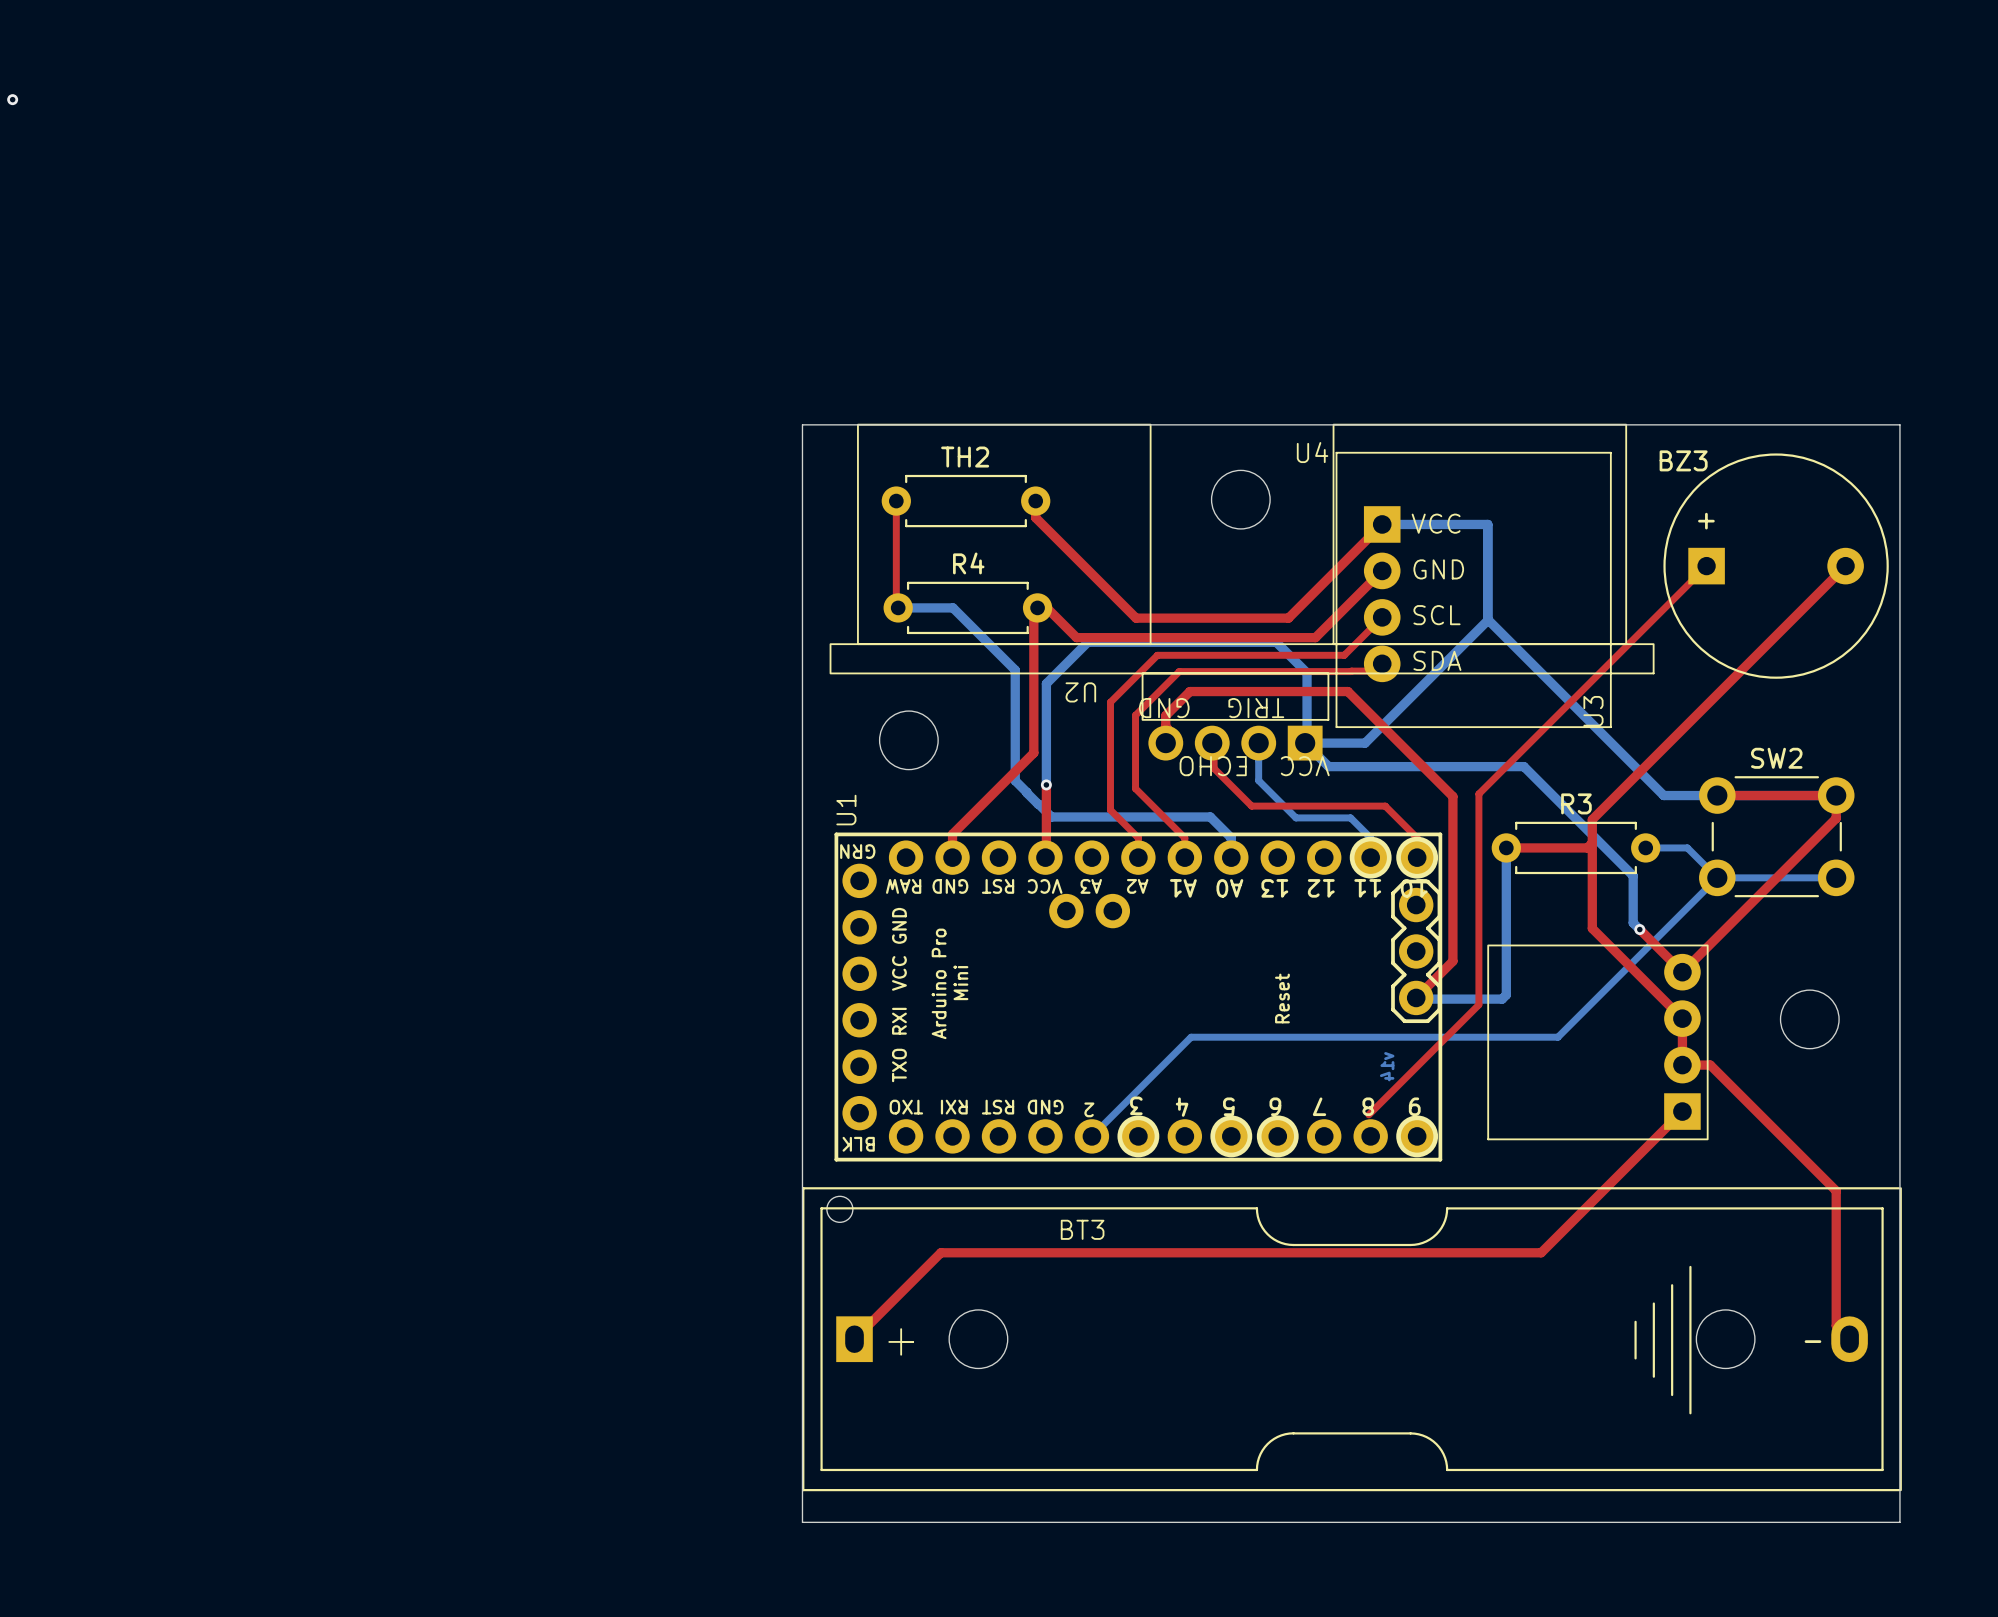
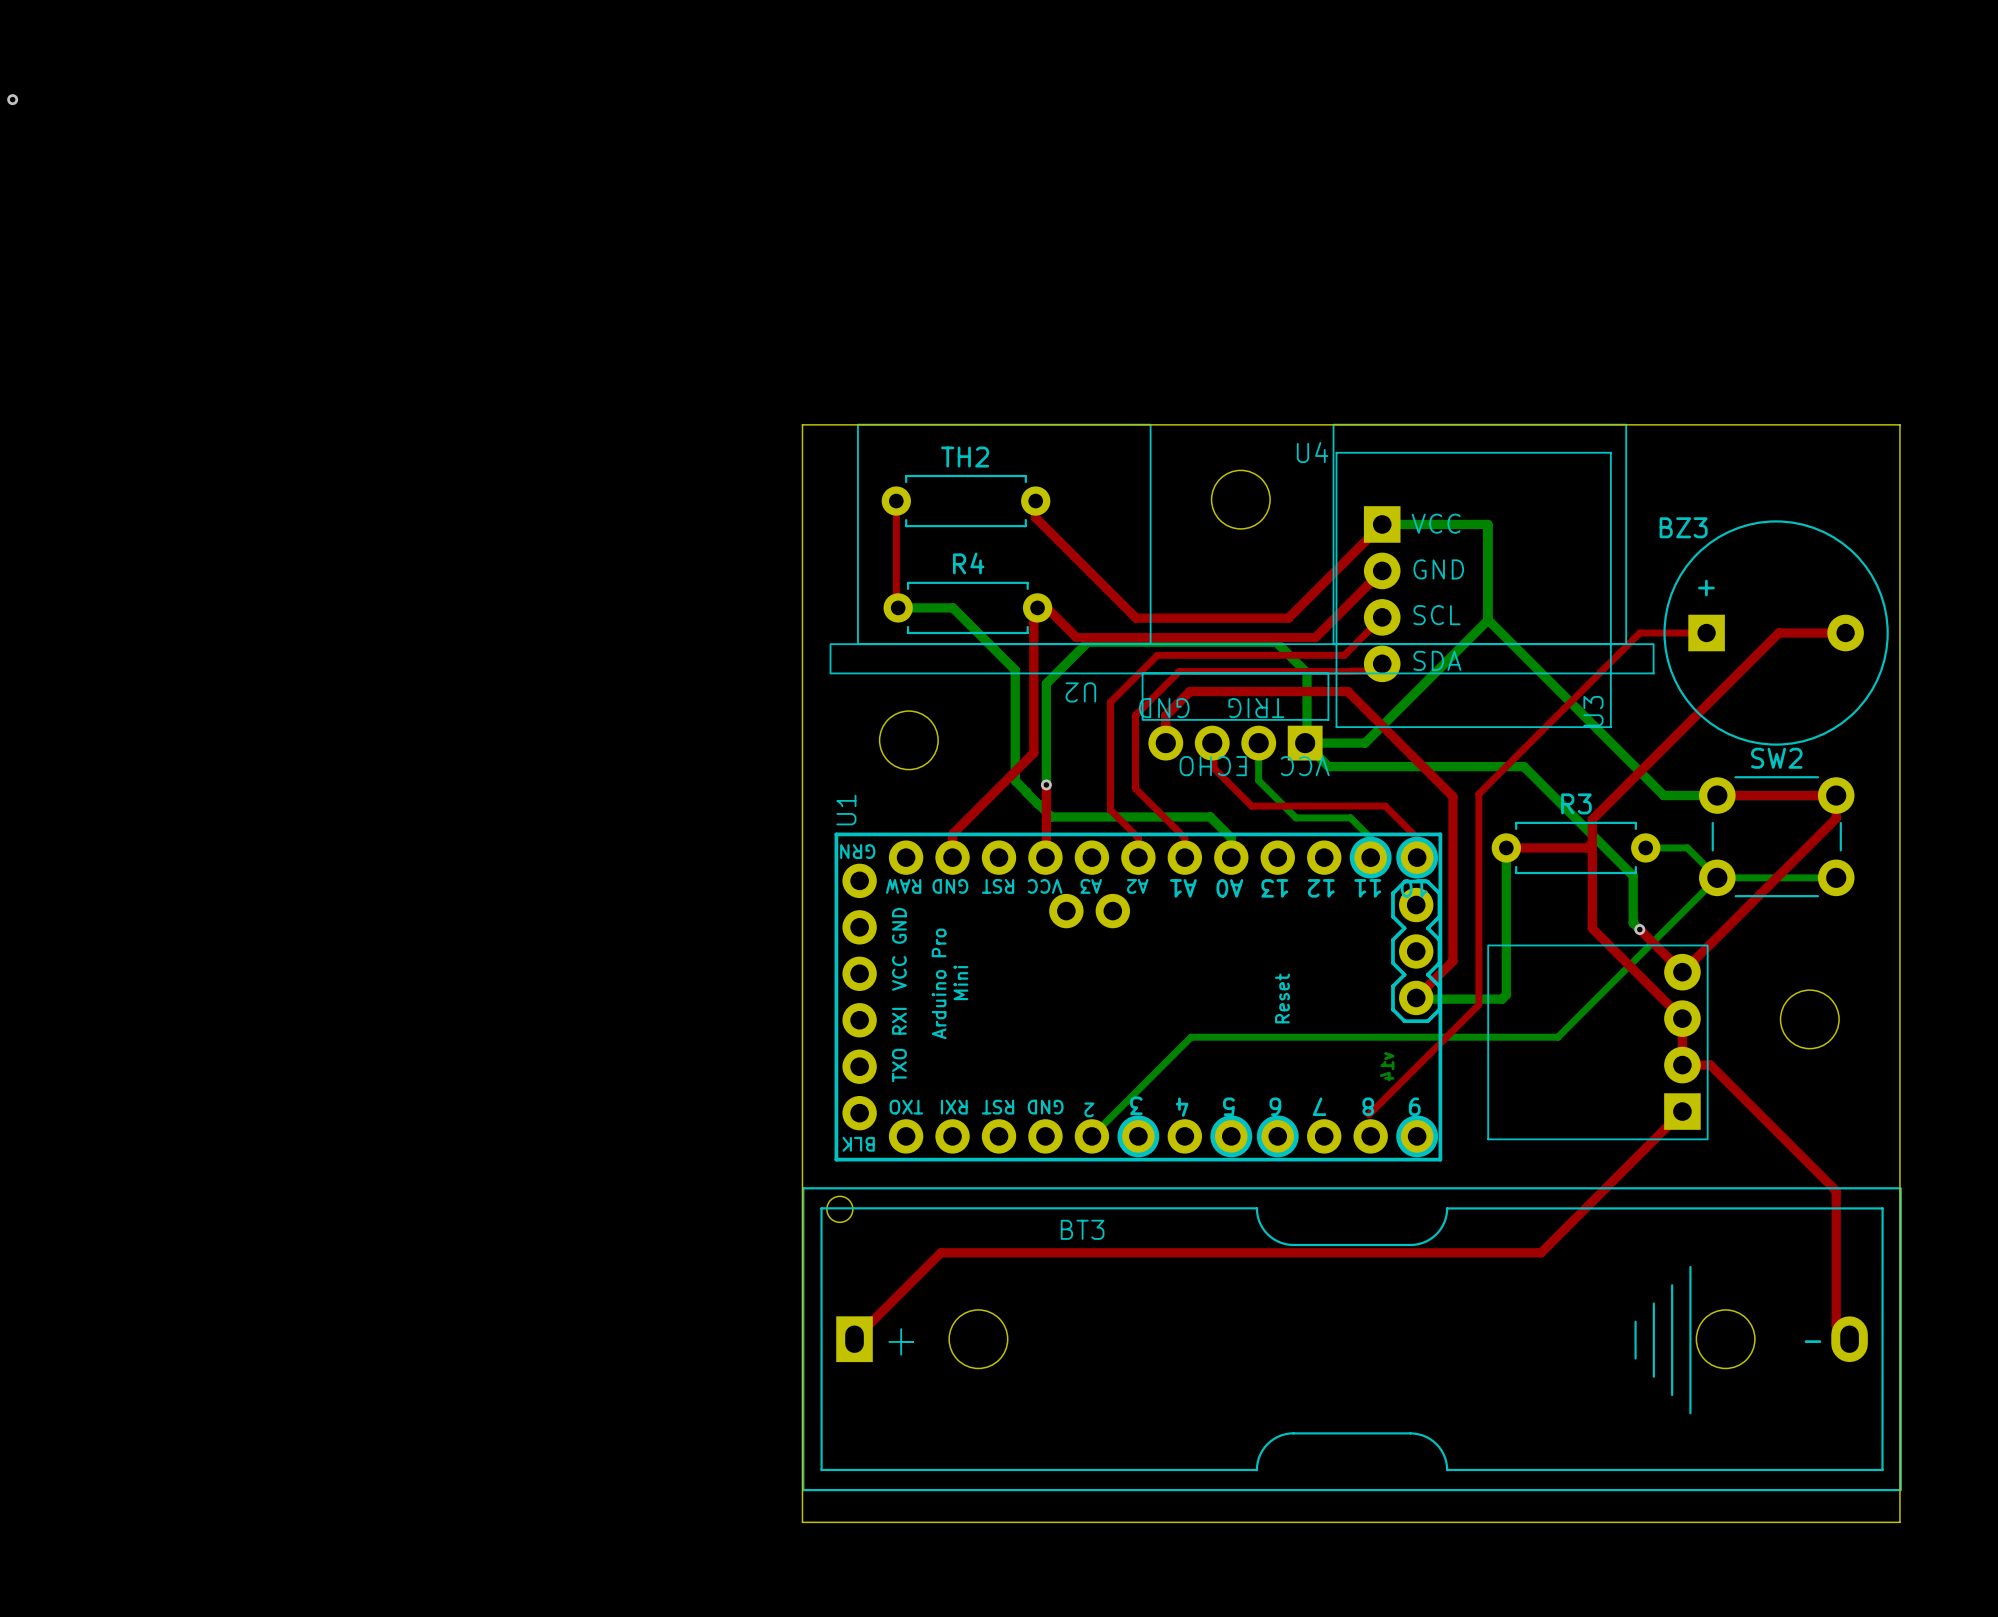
top track: (1706, 566) (1639, 633) -> (1706, 633) (1639, 633)
BZ3 position: (1776, 566) -> (1776, 633)
top track: (1845, 566) (1778, 633) -> (1845, 633) (1778, 633)

